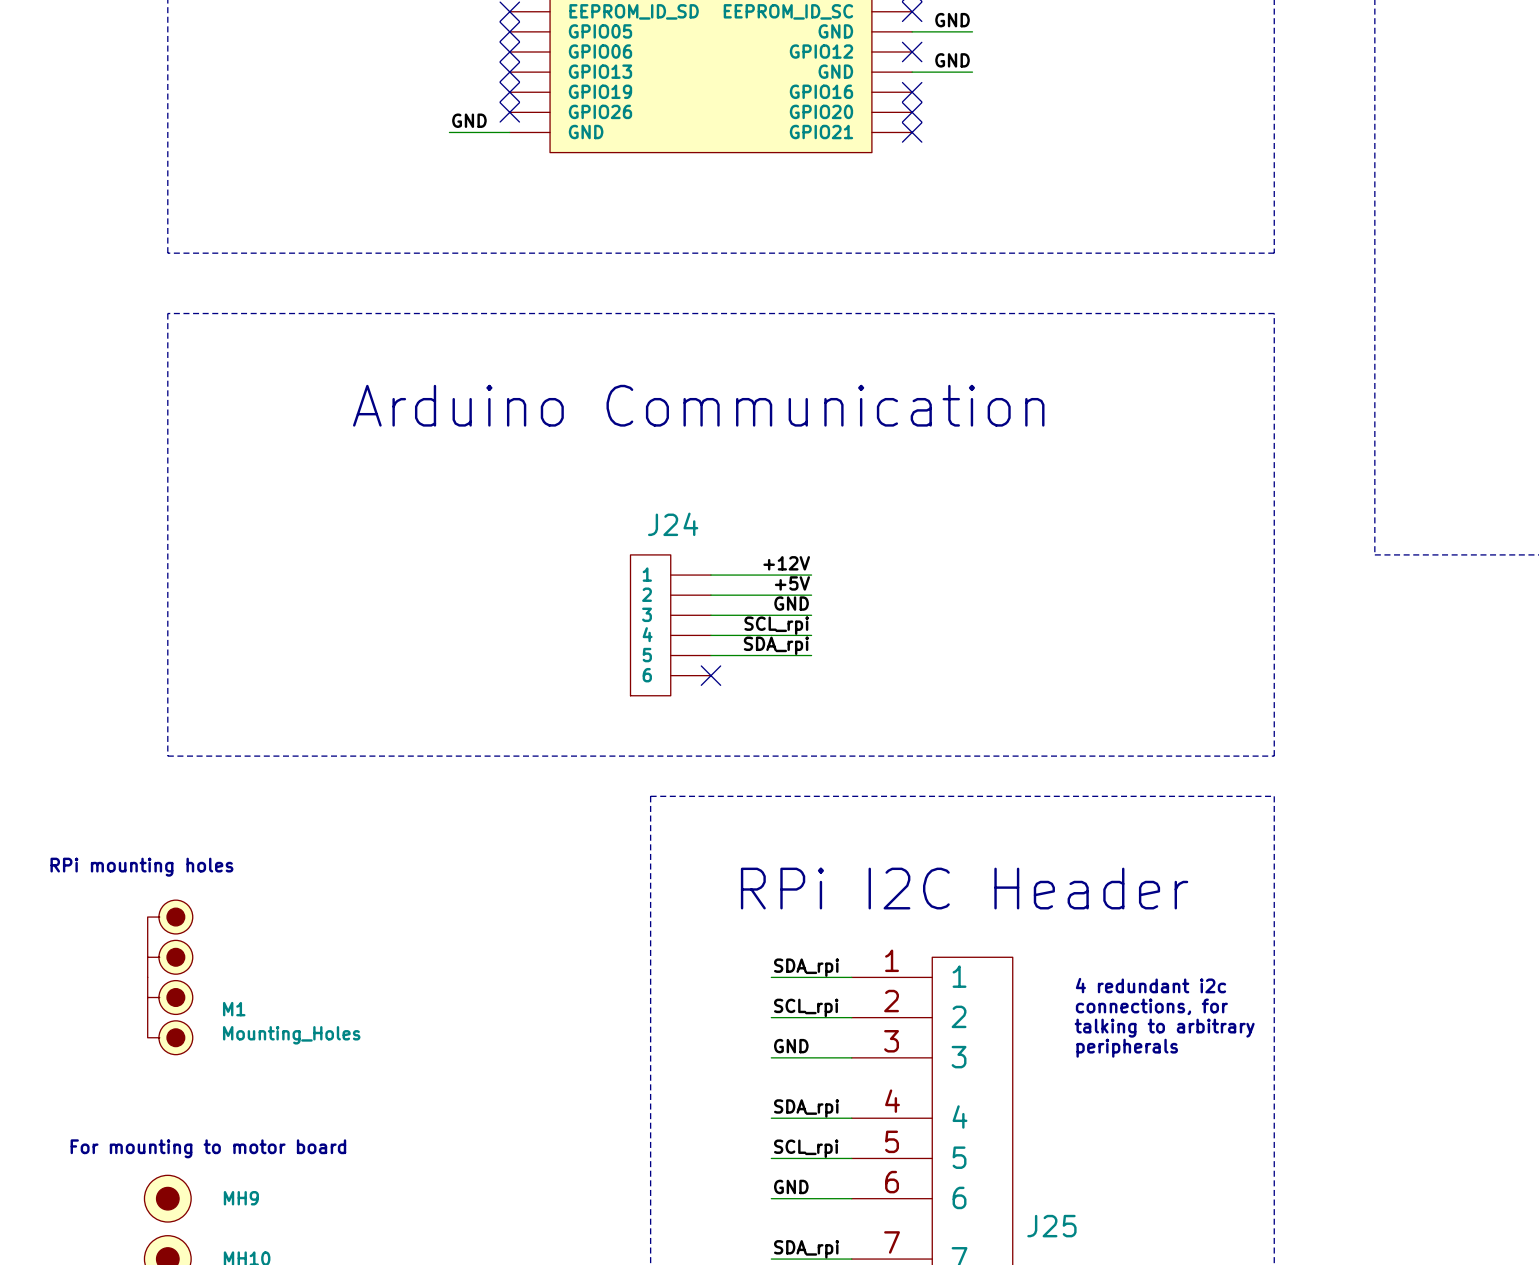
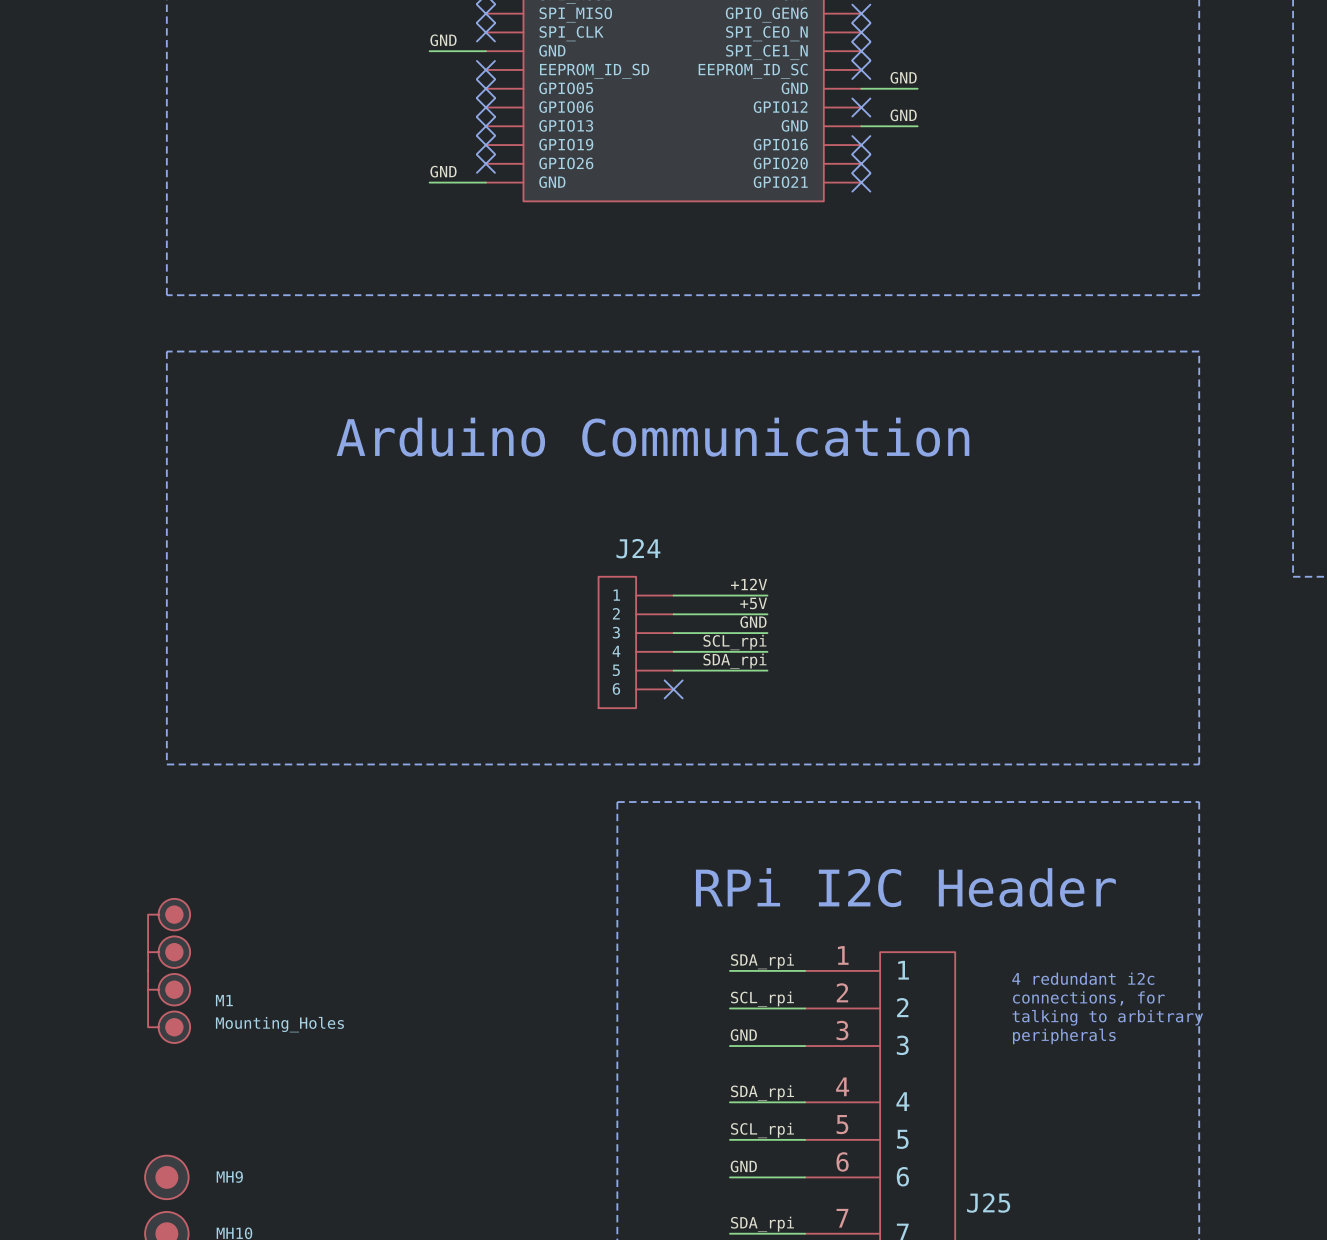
text: RPi mounting holes (141, 867) -> none
text: For mounting to motor board (208, 1148) -> none

